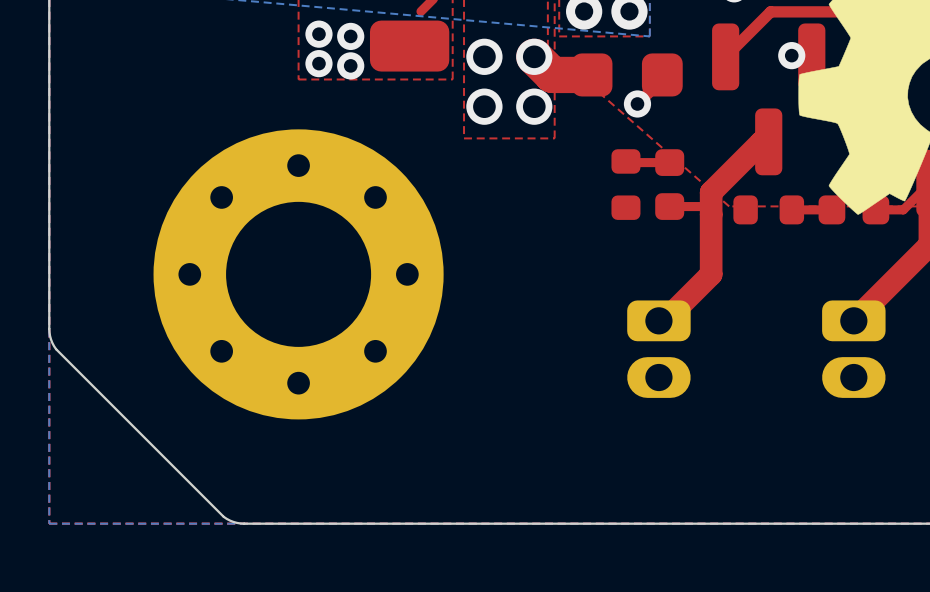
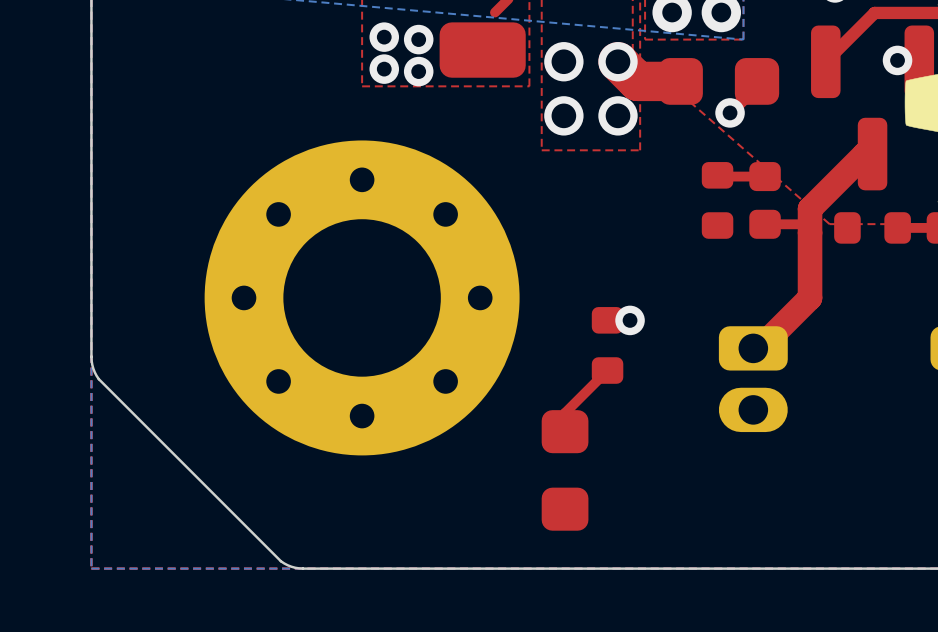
via: none -> (630, 320)
part: none -> (607, 345)
top track: none -> (607, 370) (565, 413) (565, 431)
part: none -> (565, 470)

